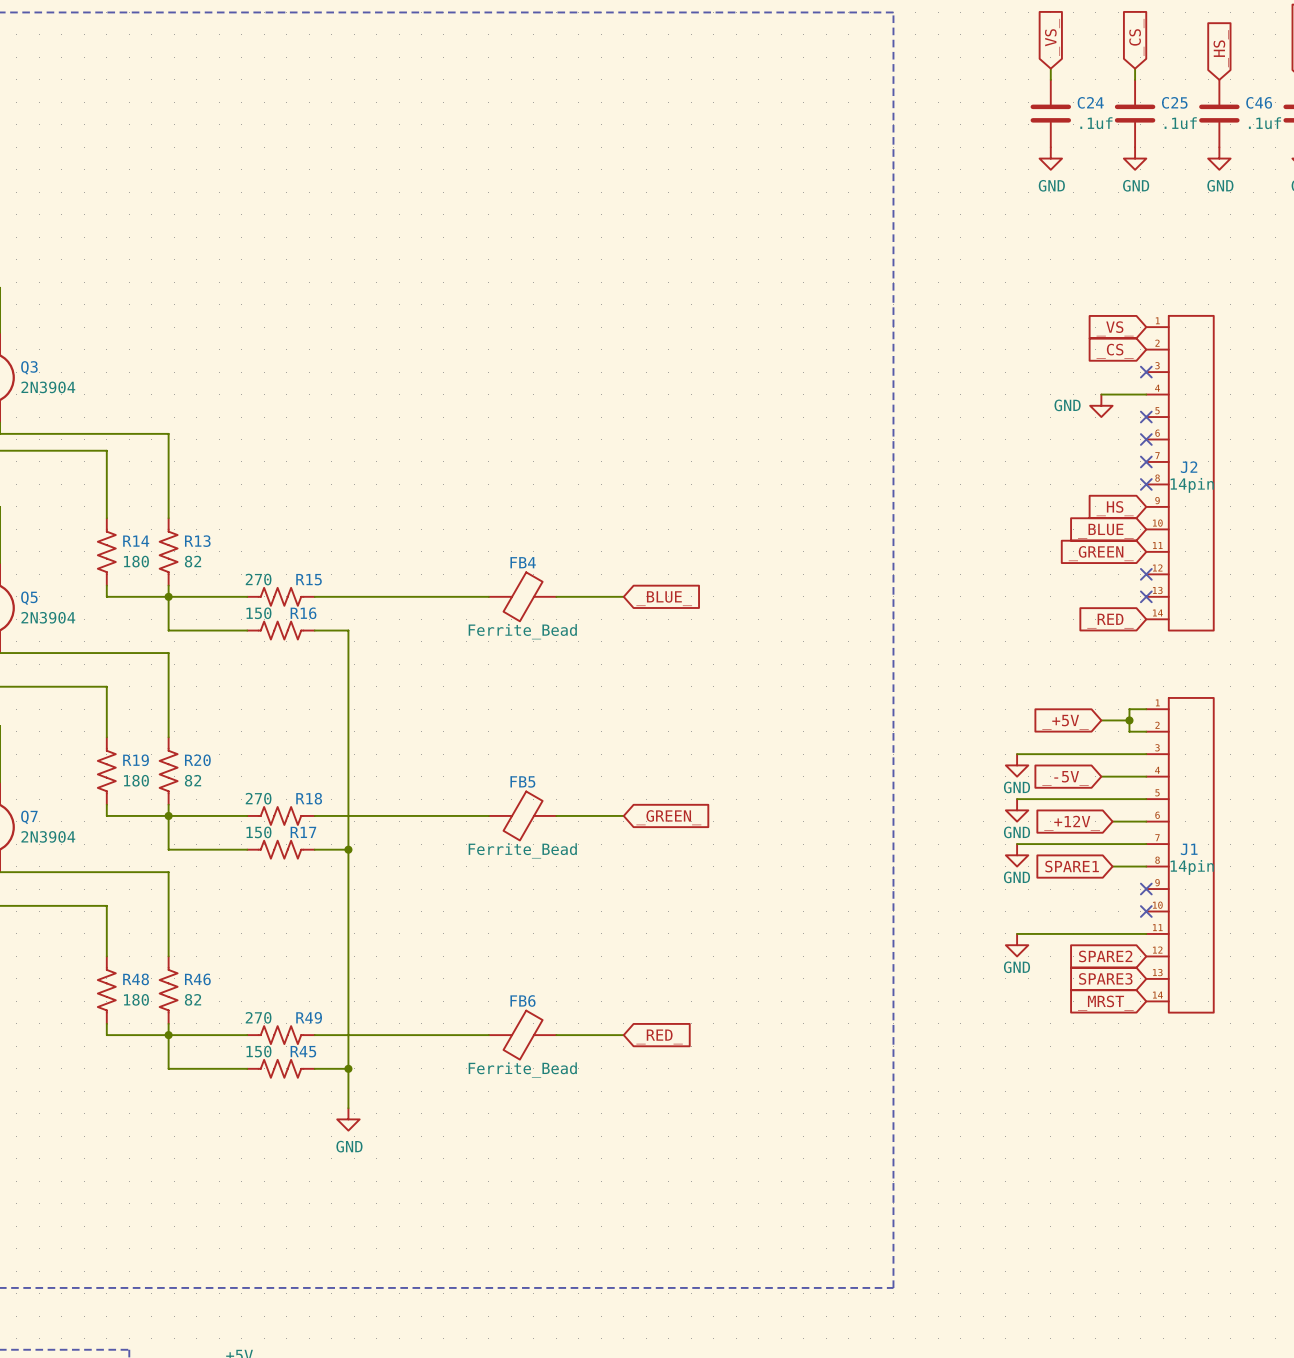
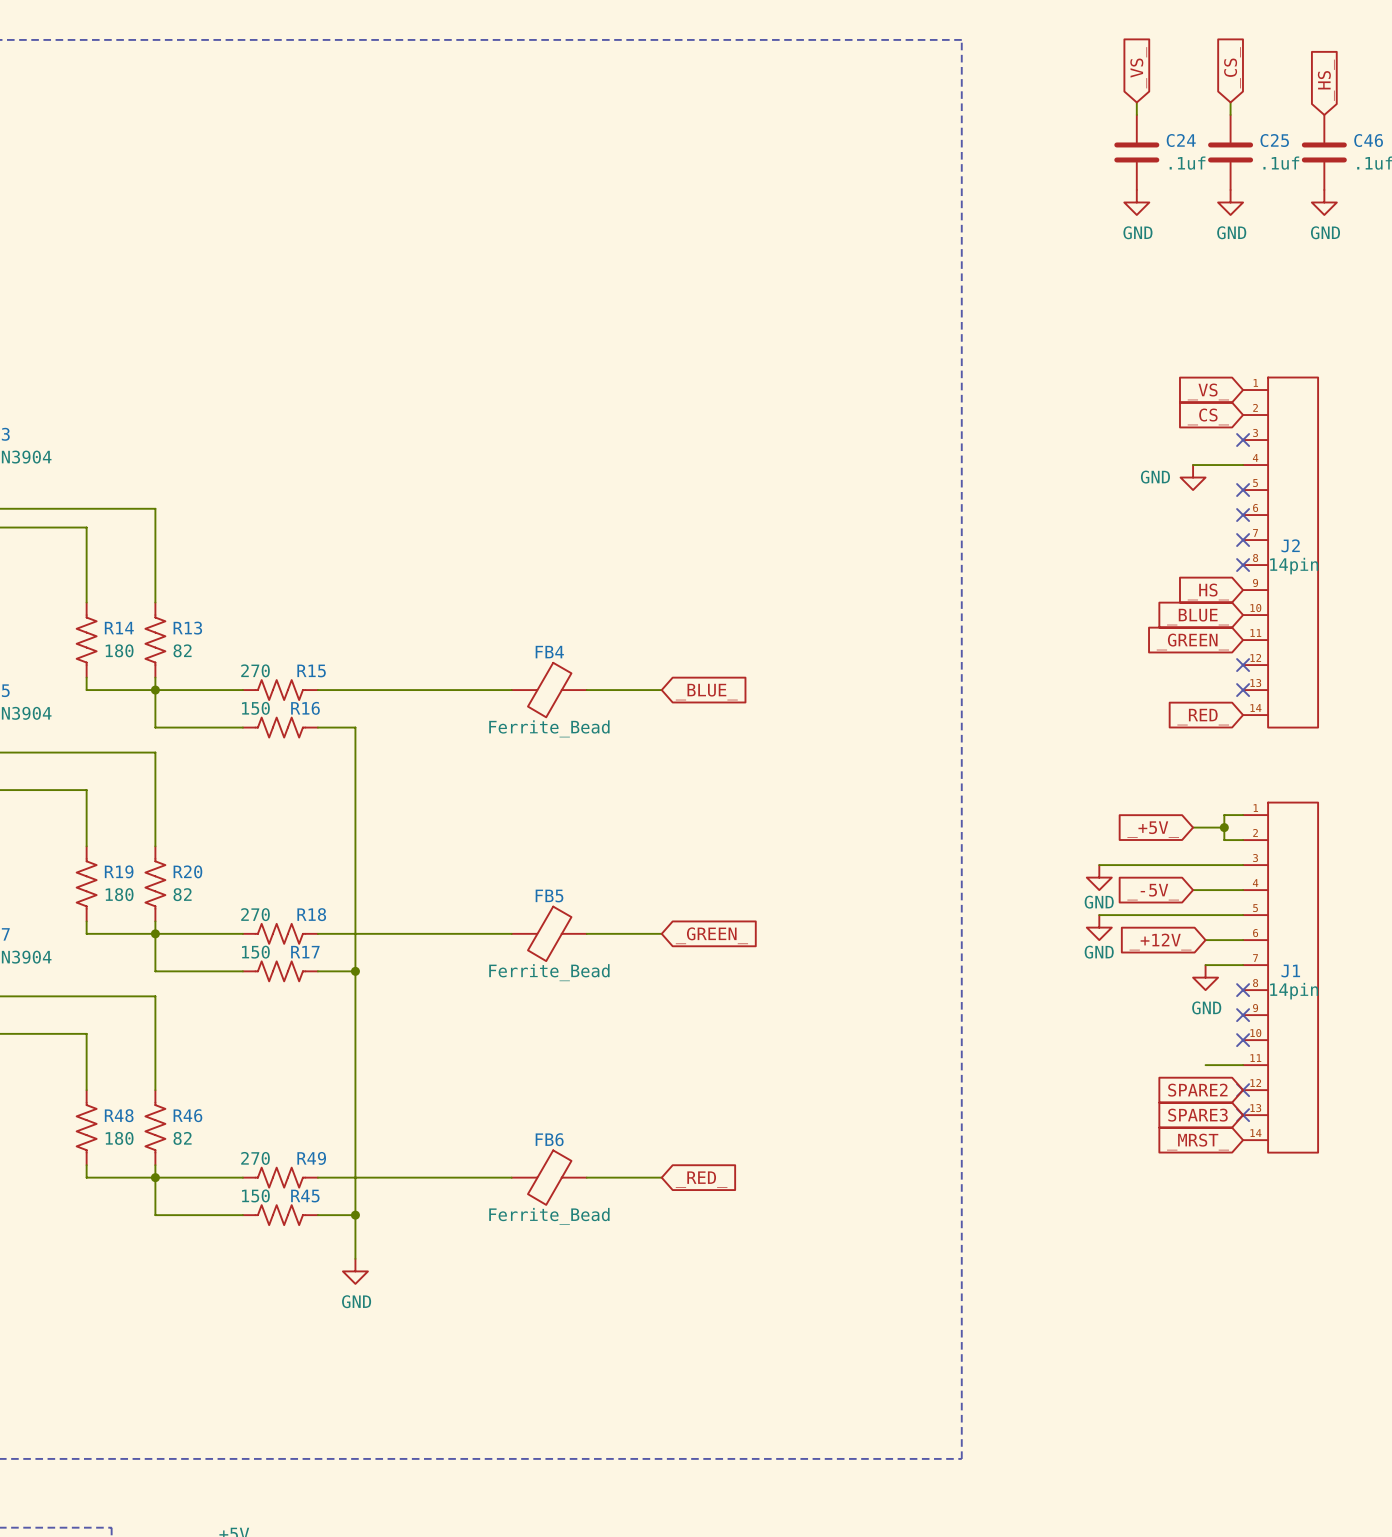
wire: (1017, 844) (1112, 844) -> none
power symbol: GND (1017, 855) -> none
power symbol: none -> GND (1205, 977)
global label: SPARE1 (1072, 866) -> none
wire: (1112, 866) (1146, 866) -> none
no-connect mark: none -> (1243, 990)
wire: (1017, 933) (1112, 933) -> none
power symbol: GND (1017, 945) -> none
no-connect mark: none -> (1243, 1090)
no-connect mark: none -> (1243, 1115)

